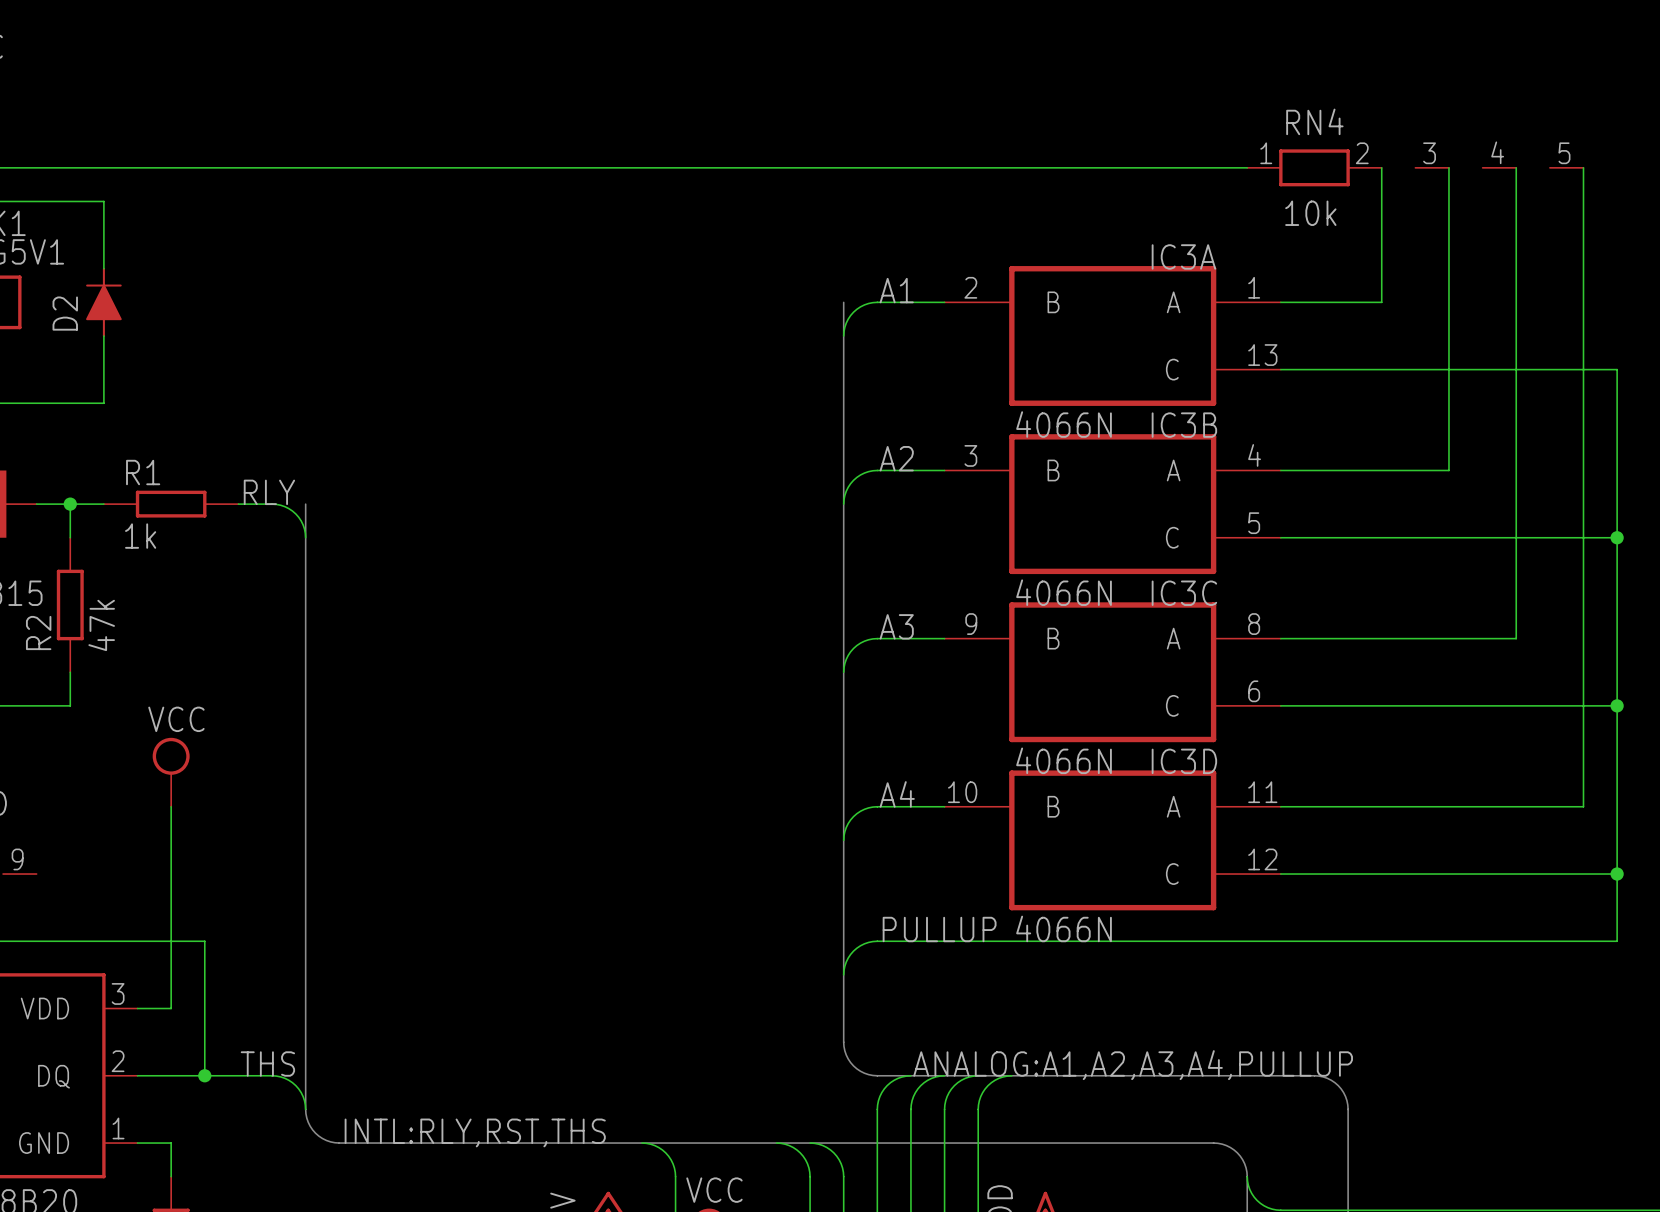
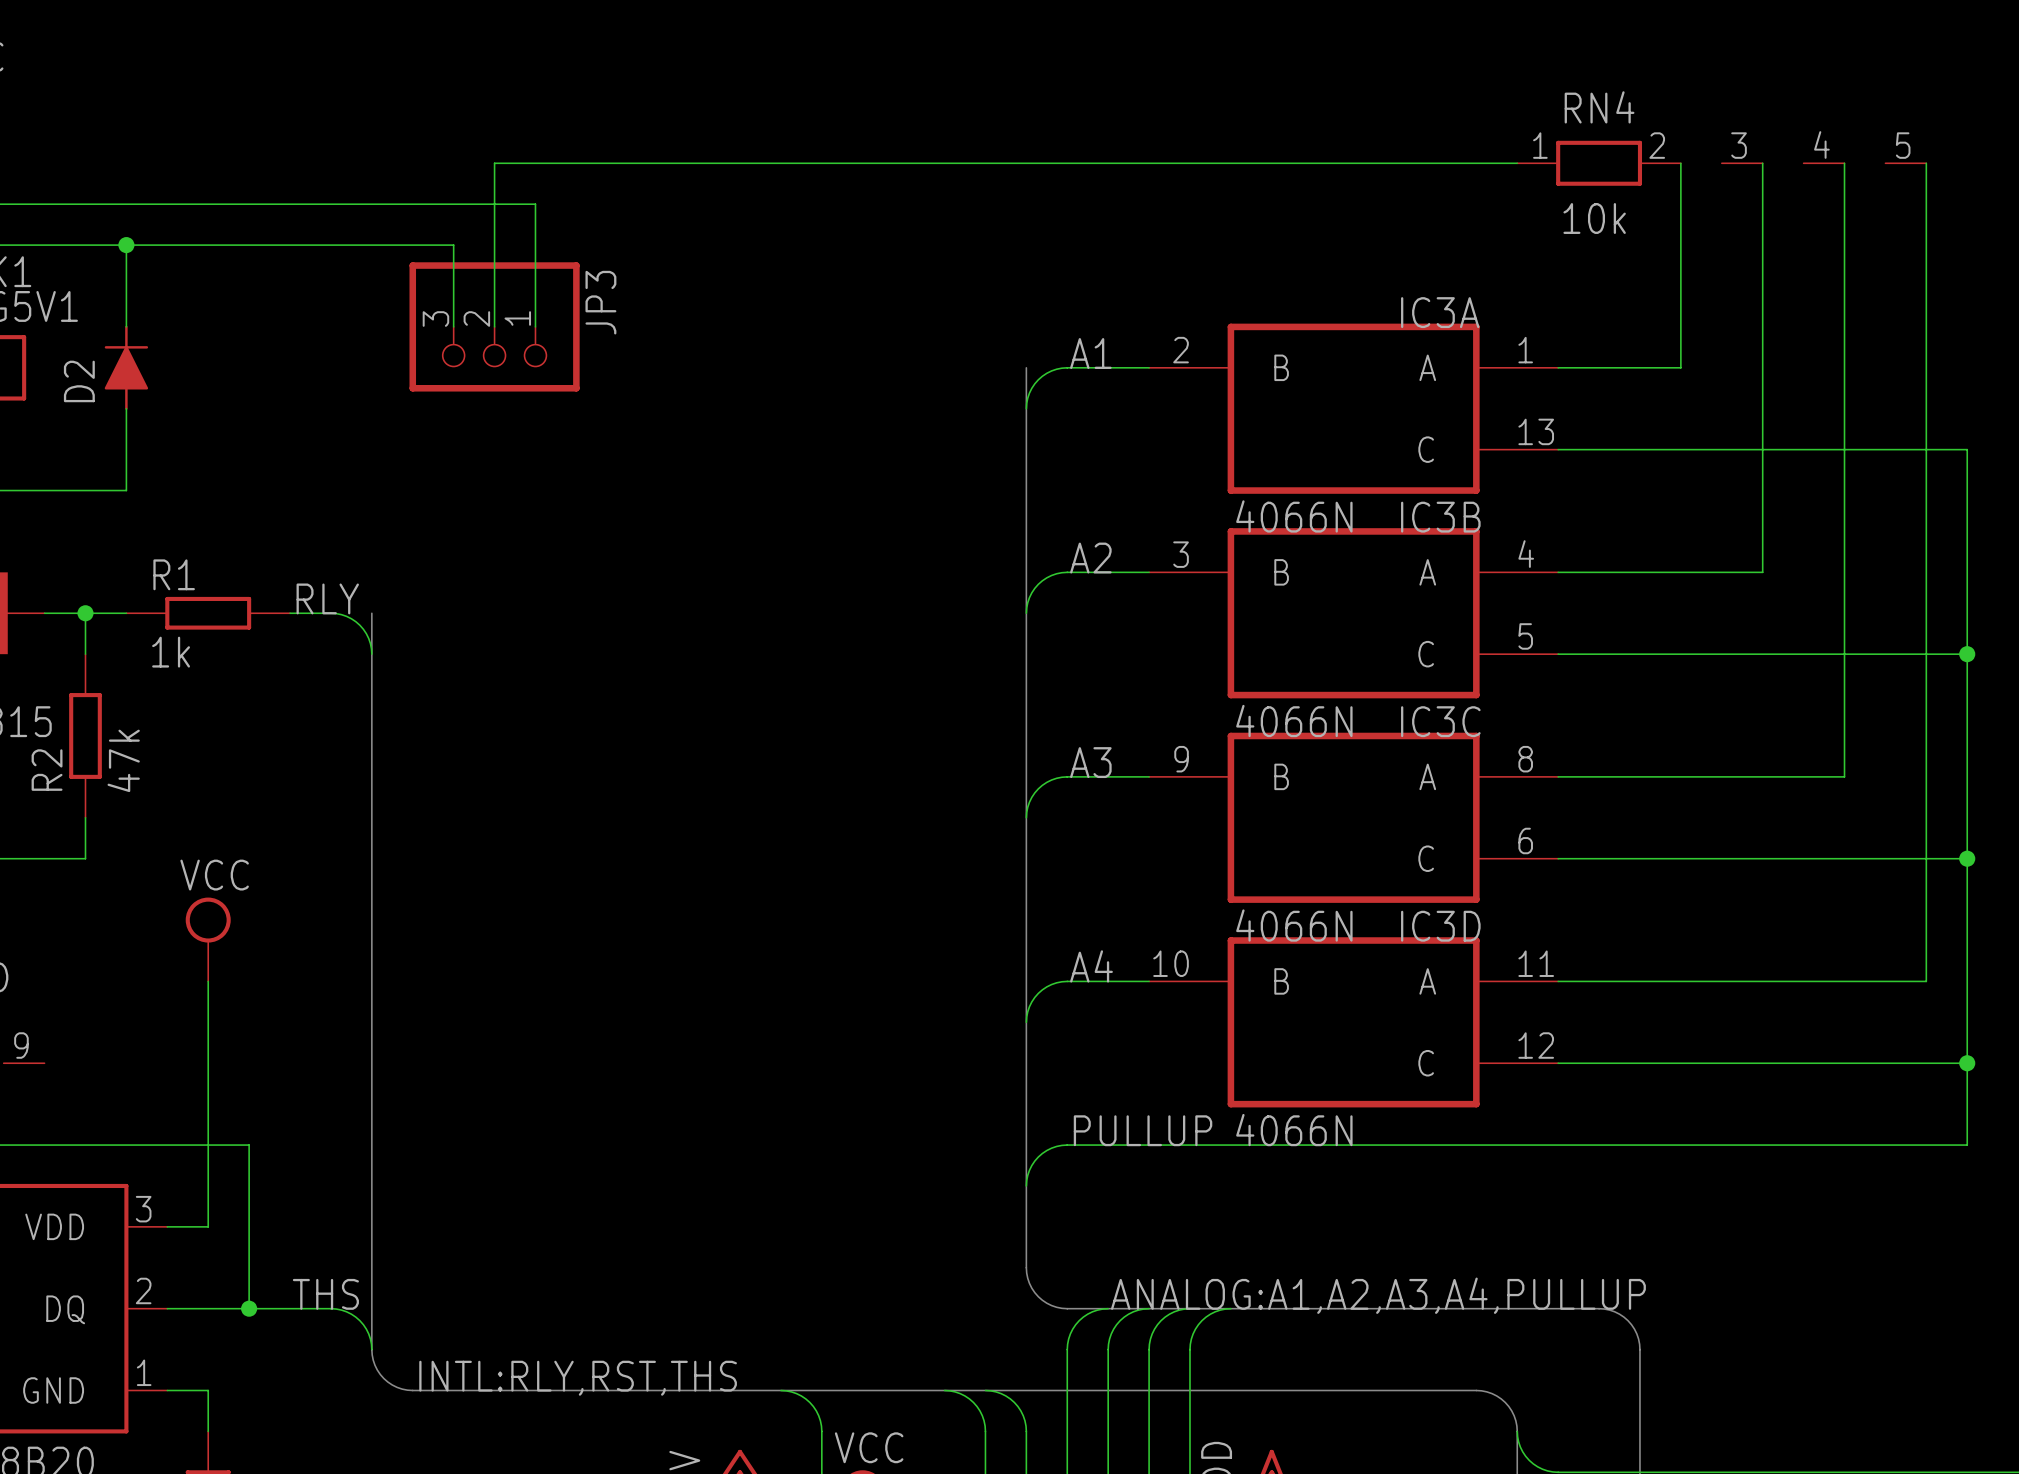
wire: none -> (1517, 163) (494, 163) (494, 326)
wire: none -> (1680, 163) (1680, 204)
wire: none -> (1762, 163) (1762, 204)
wire: none -> (1844, 163) (1844, 204)
wire: none -> (1926, 163) (1926, 204)
wire: (440, 167) (1247, 167) -> (535, 204) (535, 326)
RN4 position: (1415, 167) -> (1721, 163)
wire: none -> (126, 245) (453, 245) (453, 326)
junction: none -> (126, 245)
JP3: none -> (494, 326)

